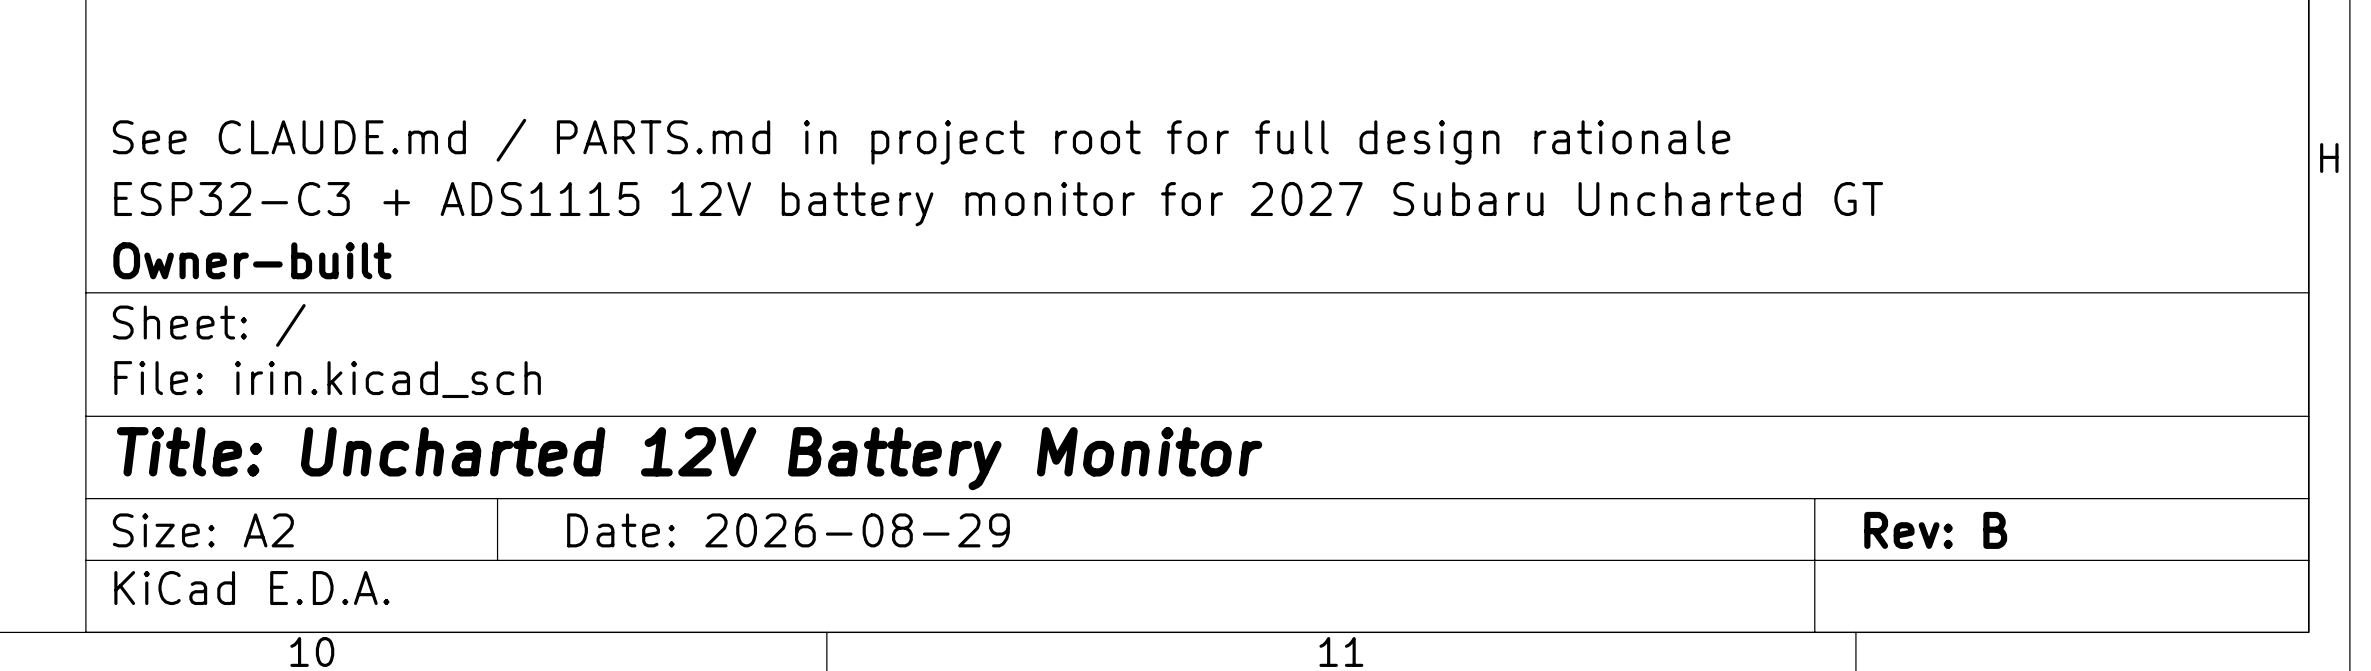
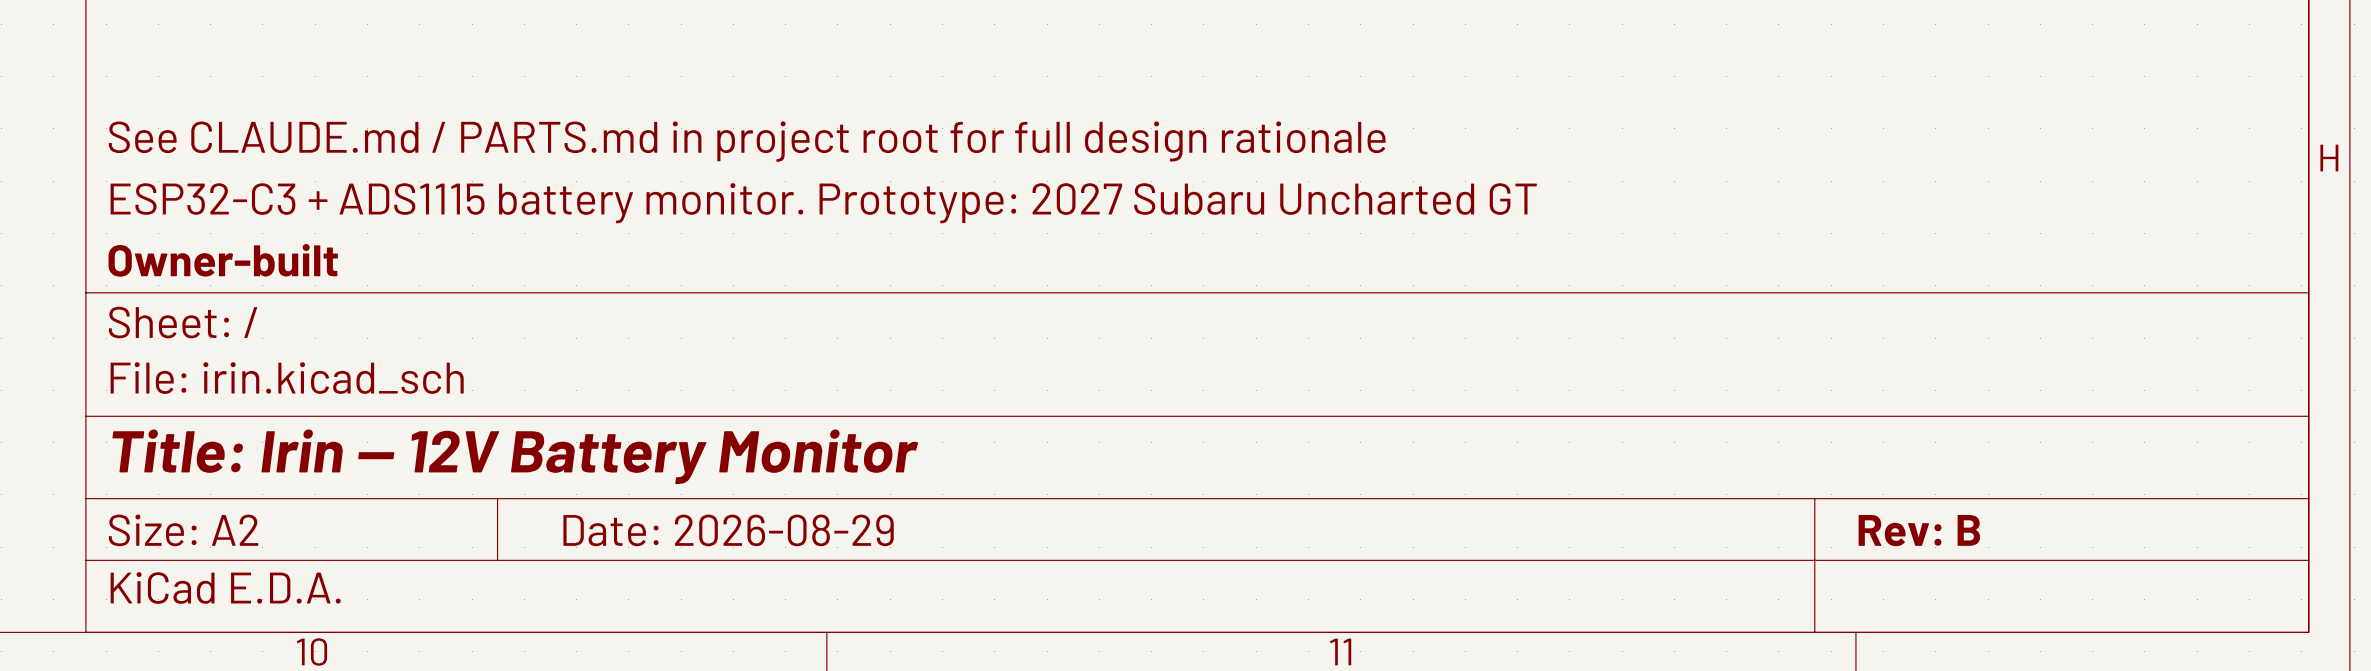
title block: ESP32-C3 + ADS1115 12V battery monitor for 2027 Subaru Uncharted GT (998, 204) -> ESP32-C3 + ADS1115 battery monitor. Prototype: 2027 Subaru Uncharted GT (823, 203)
title block: Title: Uncharted 12V Battery Monitor (689, 458) -> Title: Irin — 12V Battery Monitor (515, 456)

